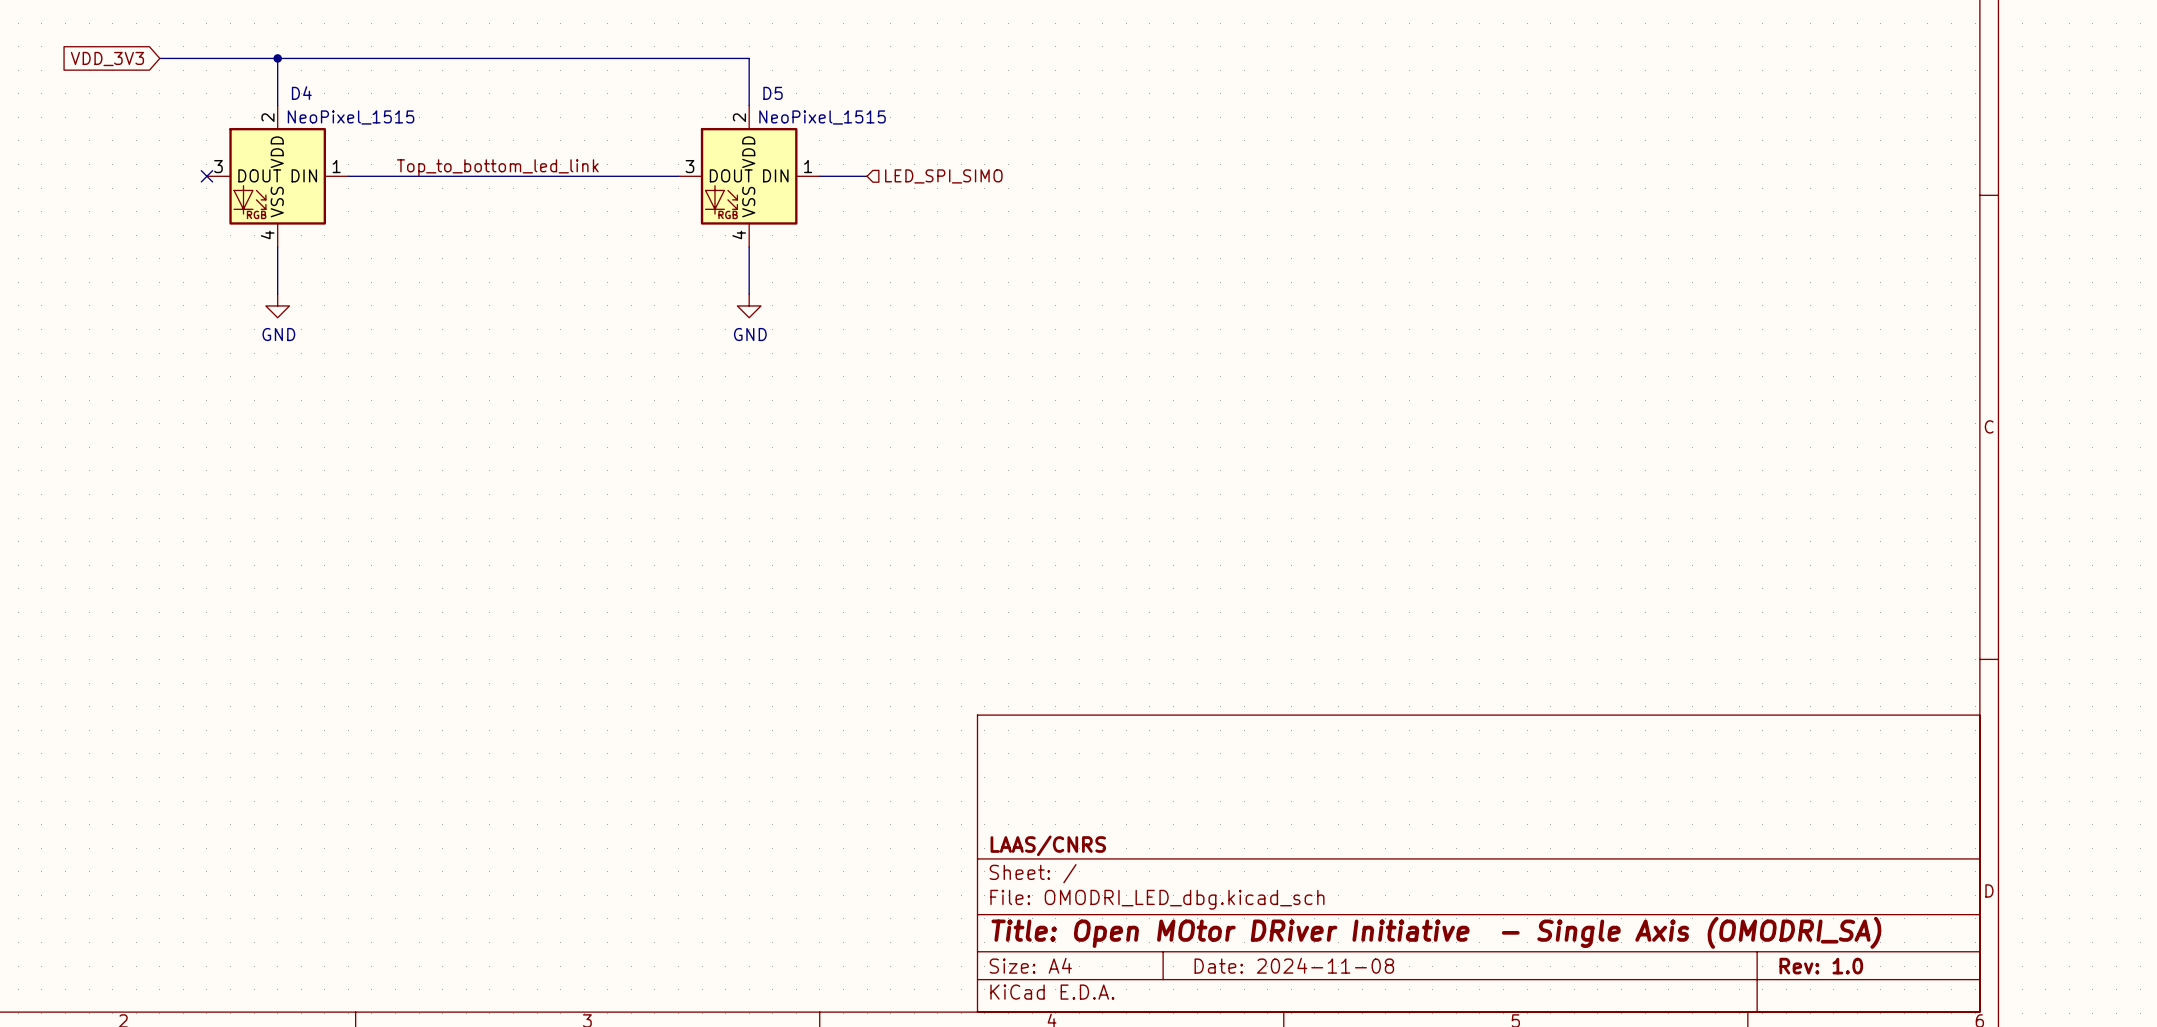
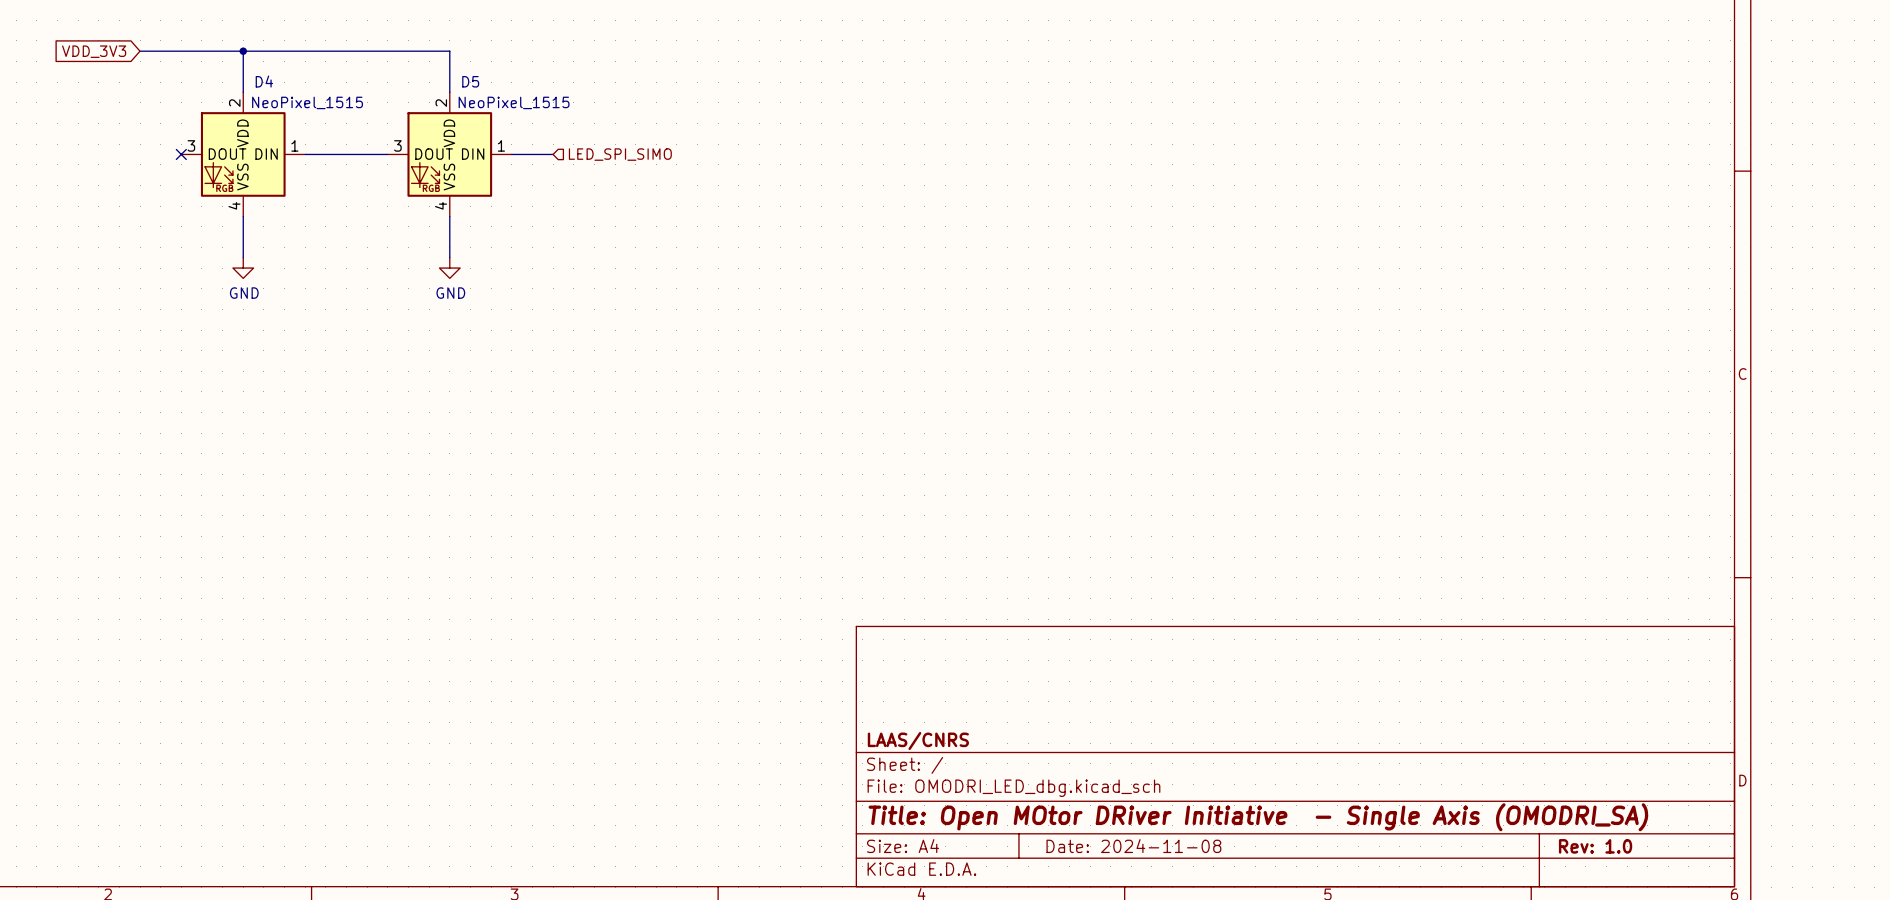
wire: (513, 58) (749, 58) (749, 105) -> (449, 51) (449, 92)
label: Top_to_bottom_led_link (497, 167) -> none
wire: (631, 176) (678, 176) -> none
hierarchical label: none -> LED_SPI_SIMO (620, 154)
D5 position: (749, 176) -> (449, 154)
wire: (819, 176) (867, 176) -> none
hierarchical label: LED_SPI_SIMO (943, 176) -> none
wire: none -> (449, 216) (449, 257)
wire: (749, 247) (749, 294) -> none
power symbol: none -> GND (449, 268)
power symbol: GND (749, 305) -> none

